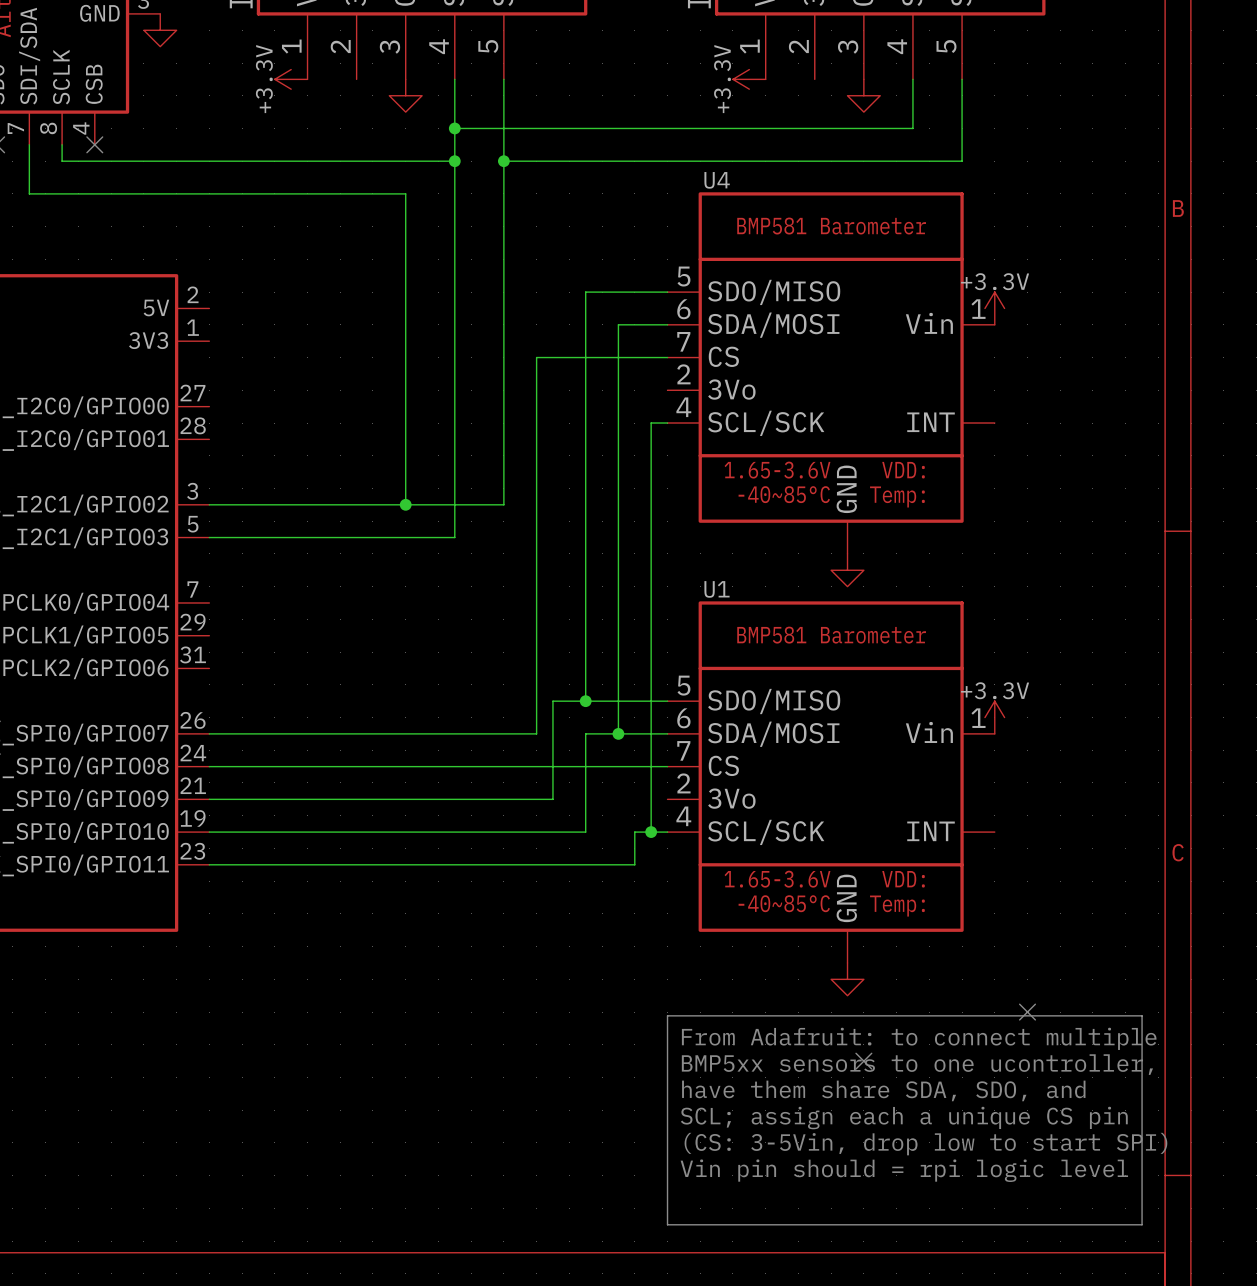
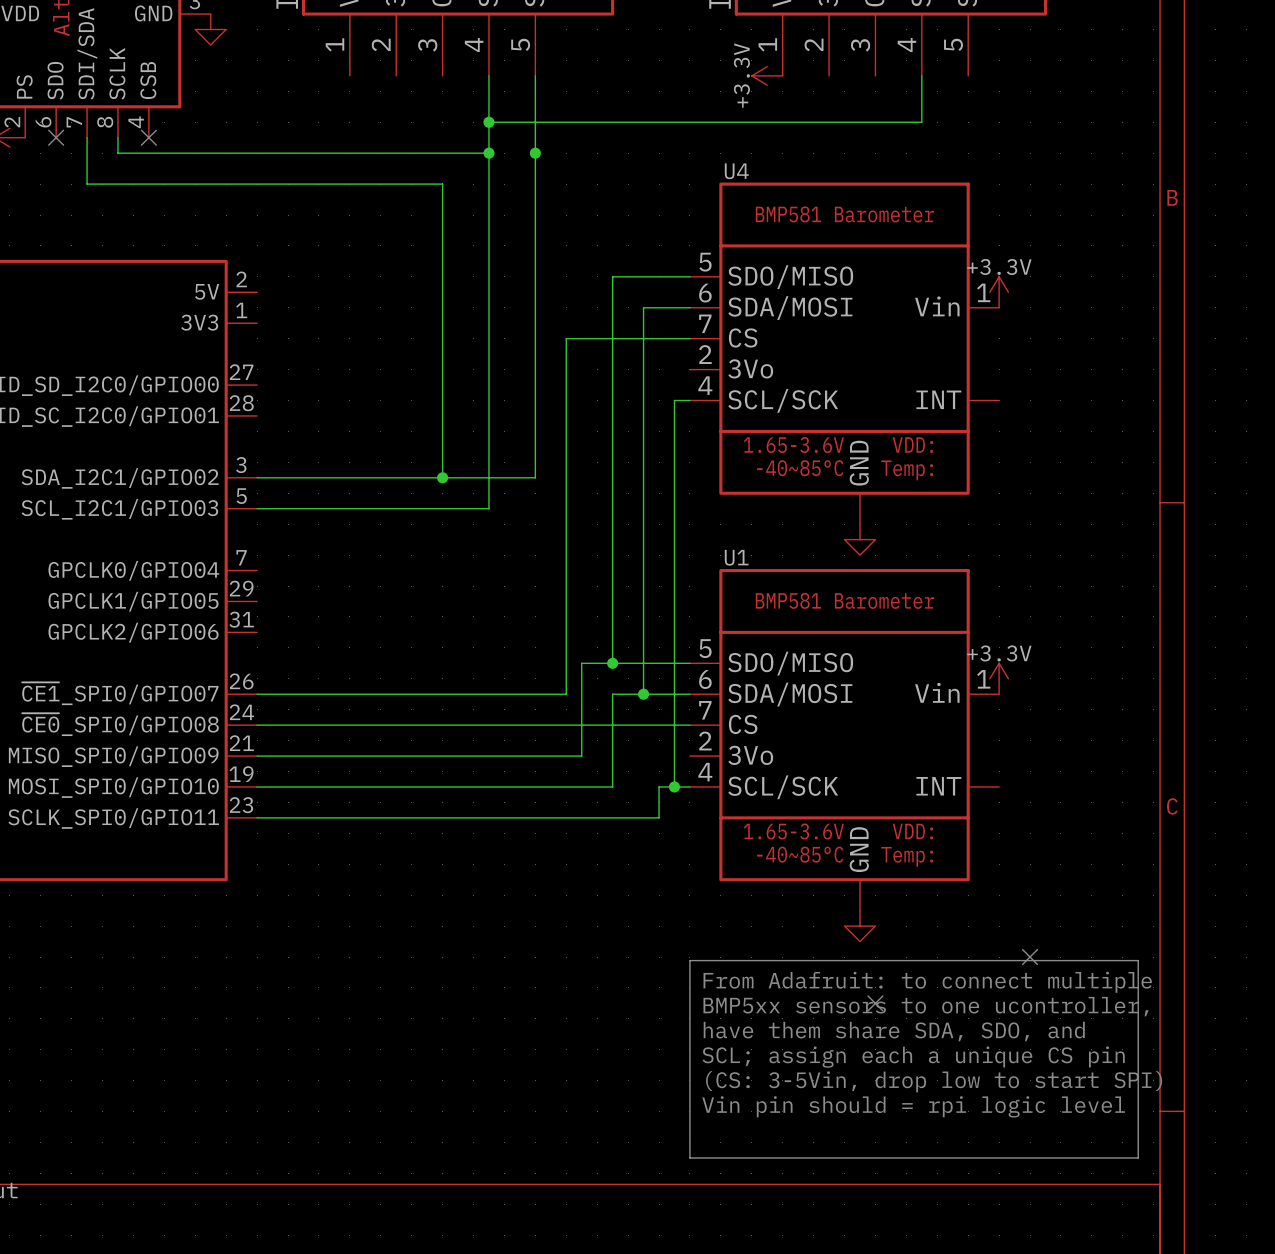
power symbol: +3.3V (291, 79) -> none
wire: (962, 79) (962, 161) (503, 161) -> none
power symbol: (405, 95) -> none
power symbol: (863, 95) -> none

